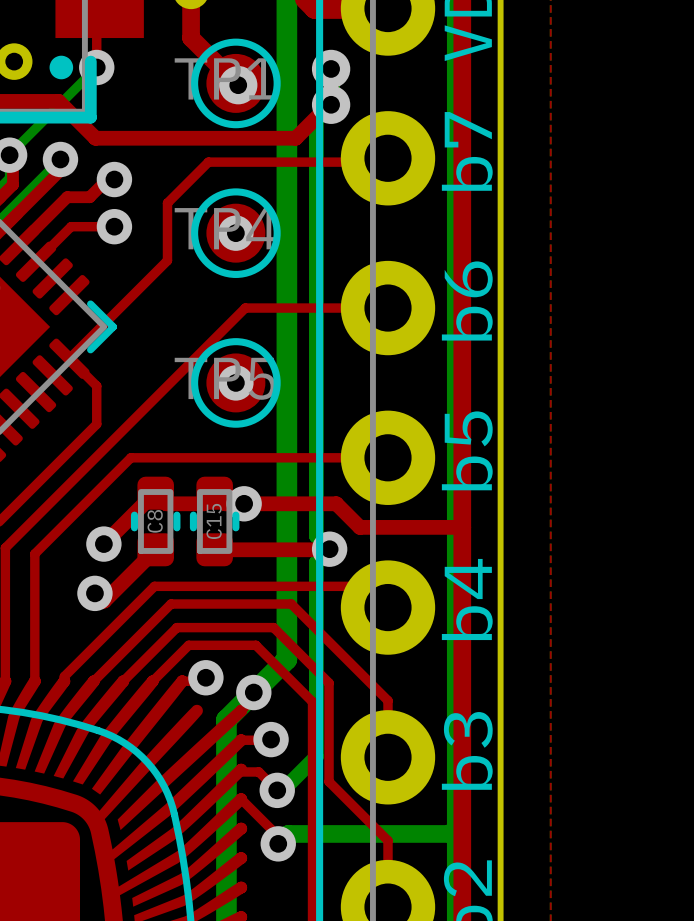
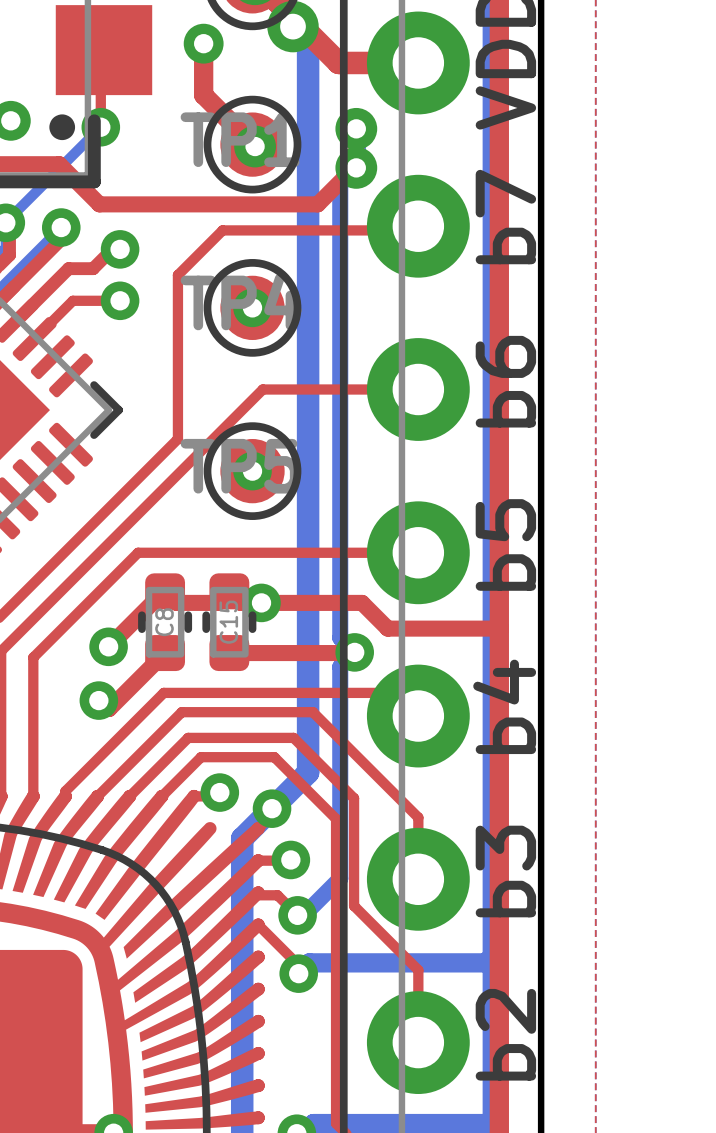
top track: (167, 260) (69, 358) (96, 386) (96, 424) -> (177, 337) (177, 438) (100, 516)

